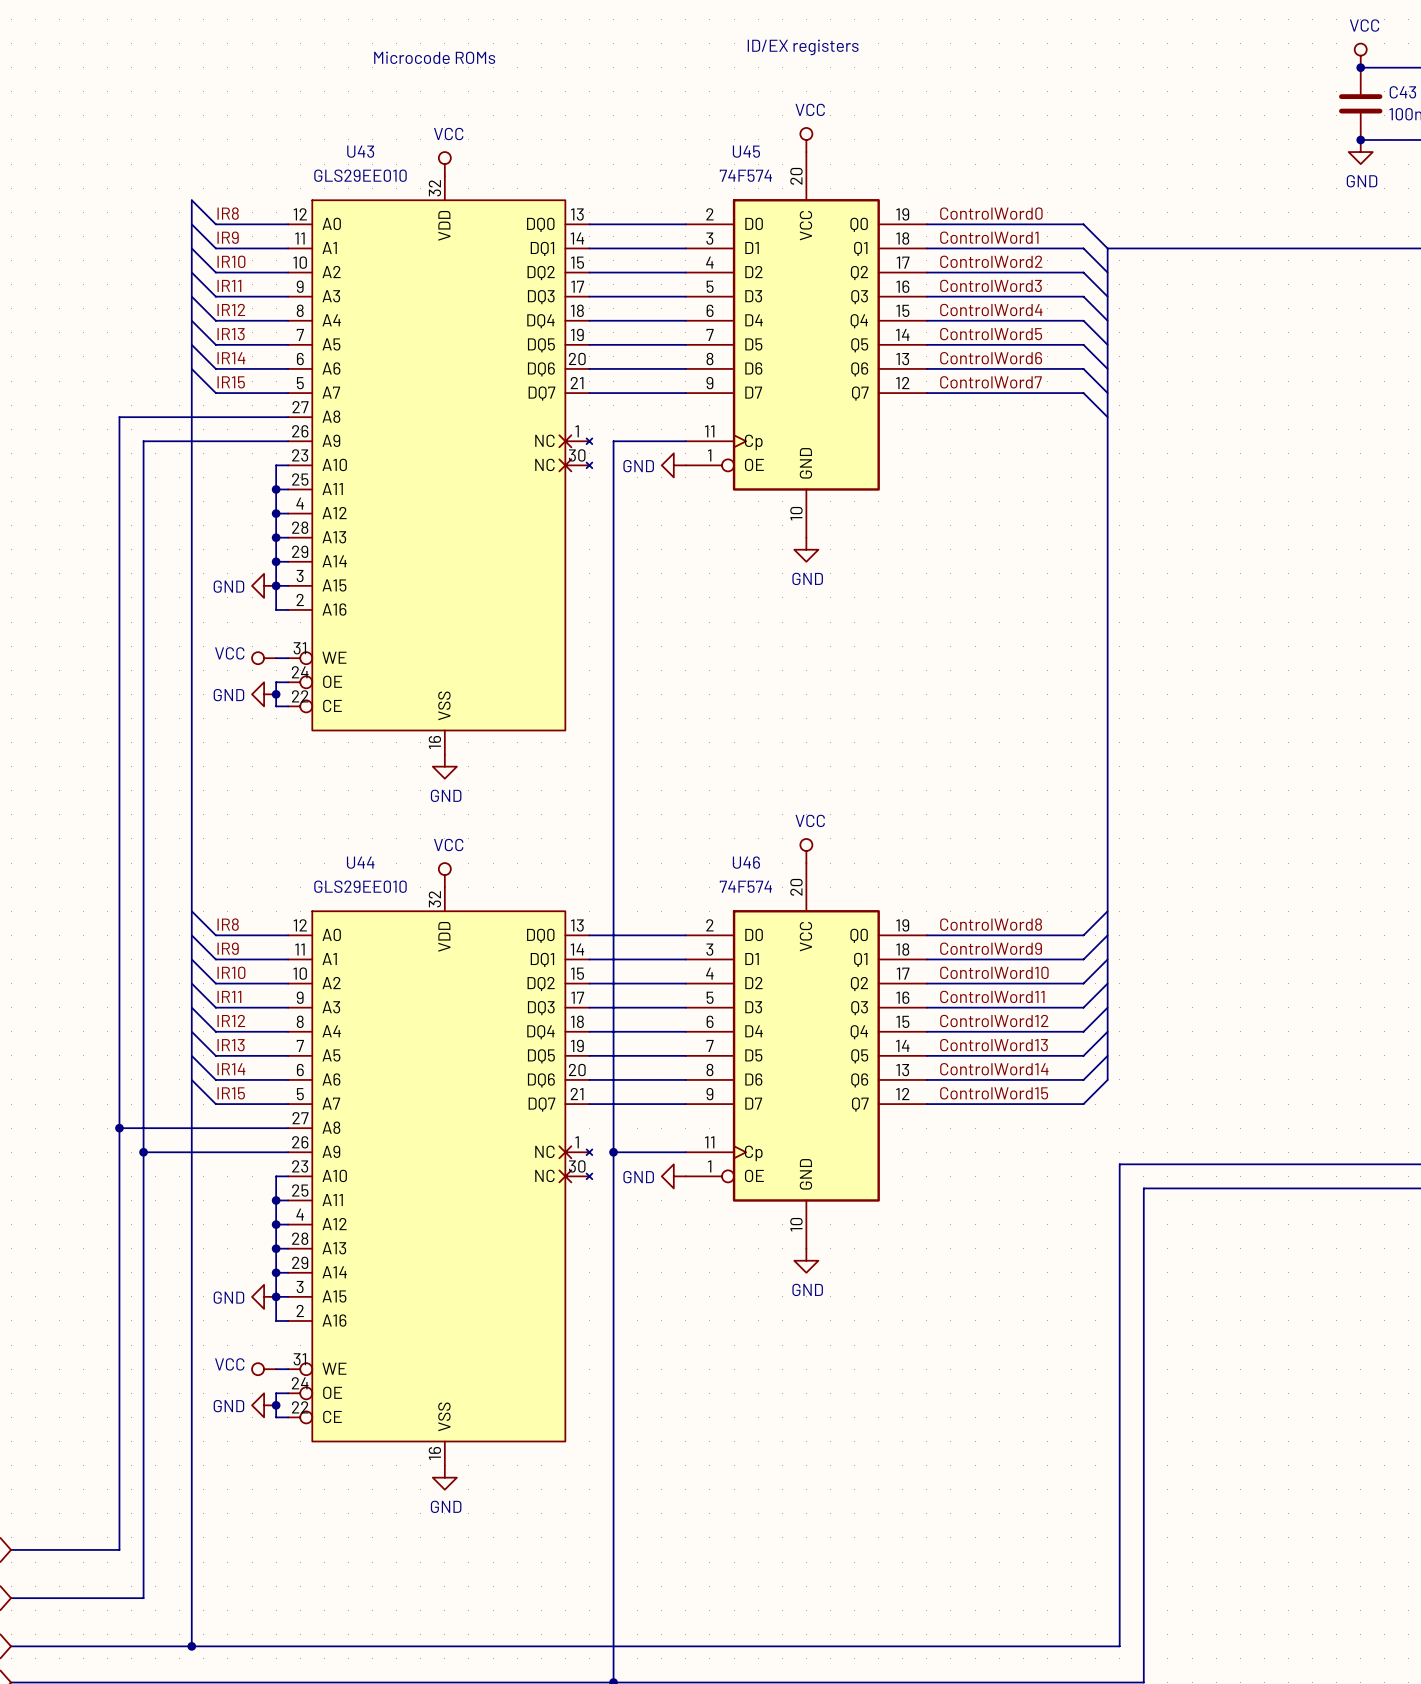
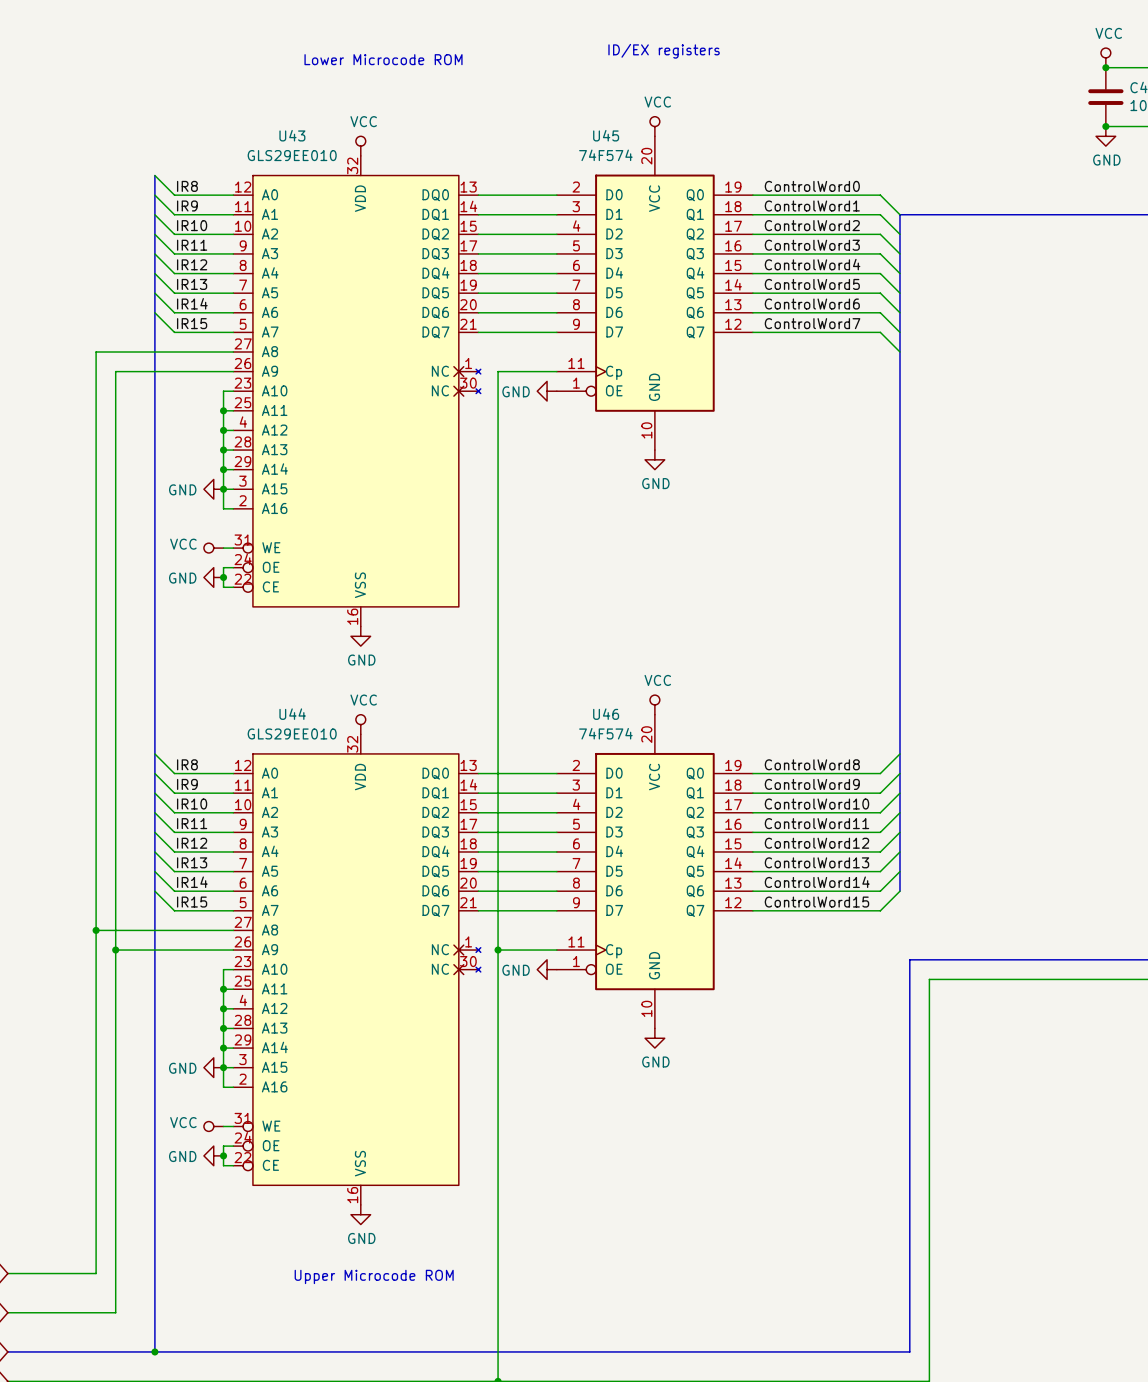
text: Microcode ROMs (434, 57) -> Lower Microcode ROM (383, 59)
text: none -> Upper Microcode ROM (374, 1276)

